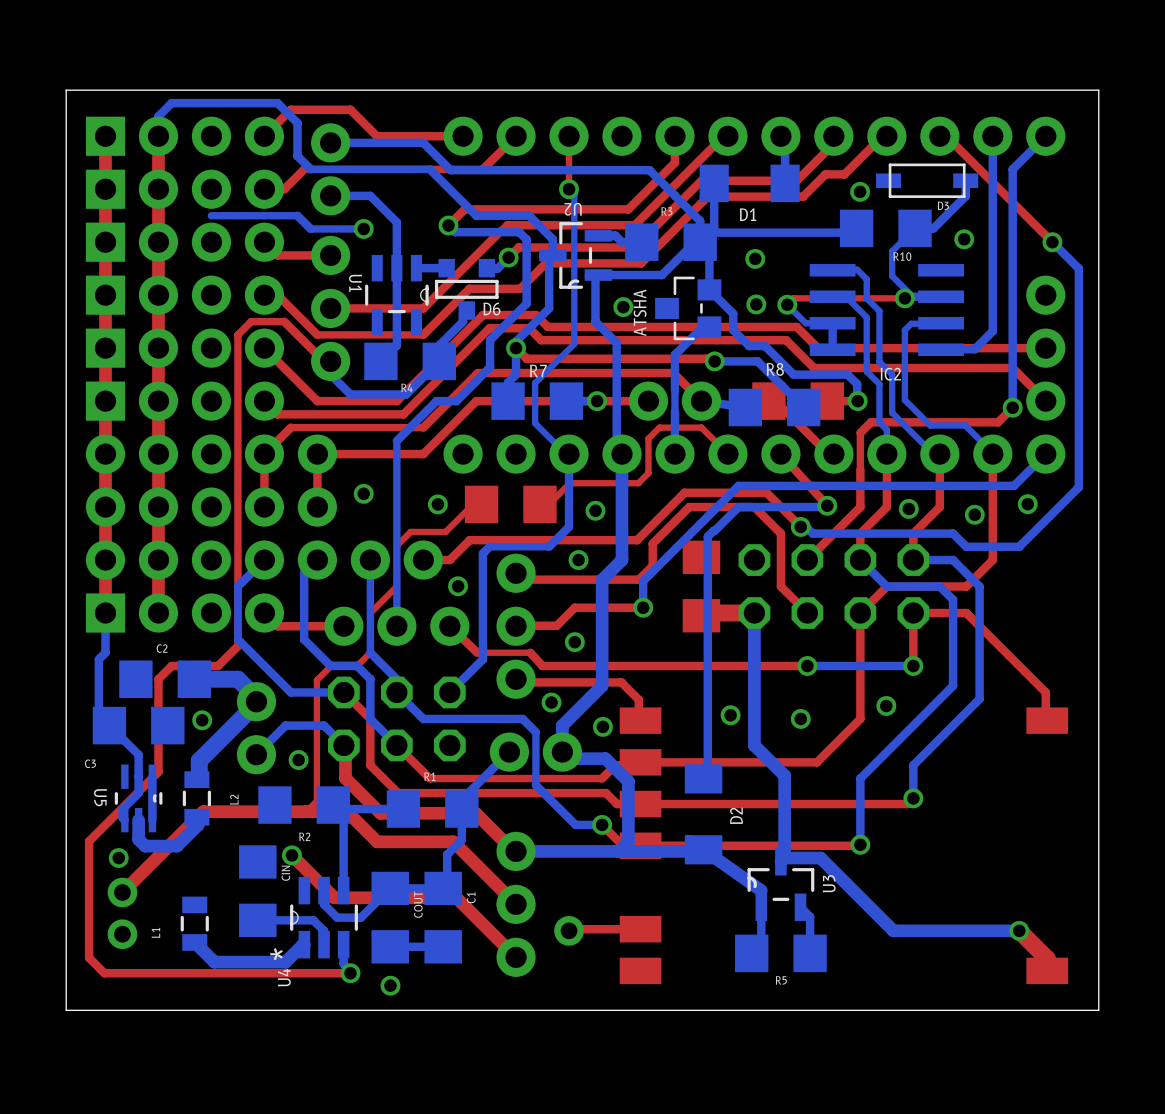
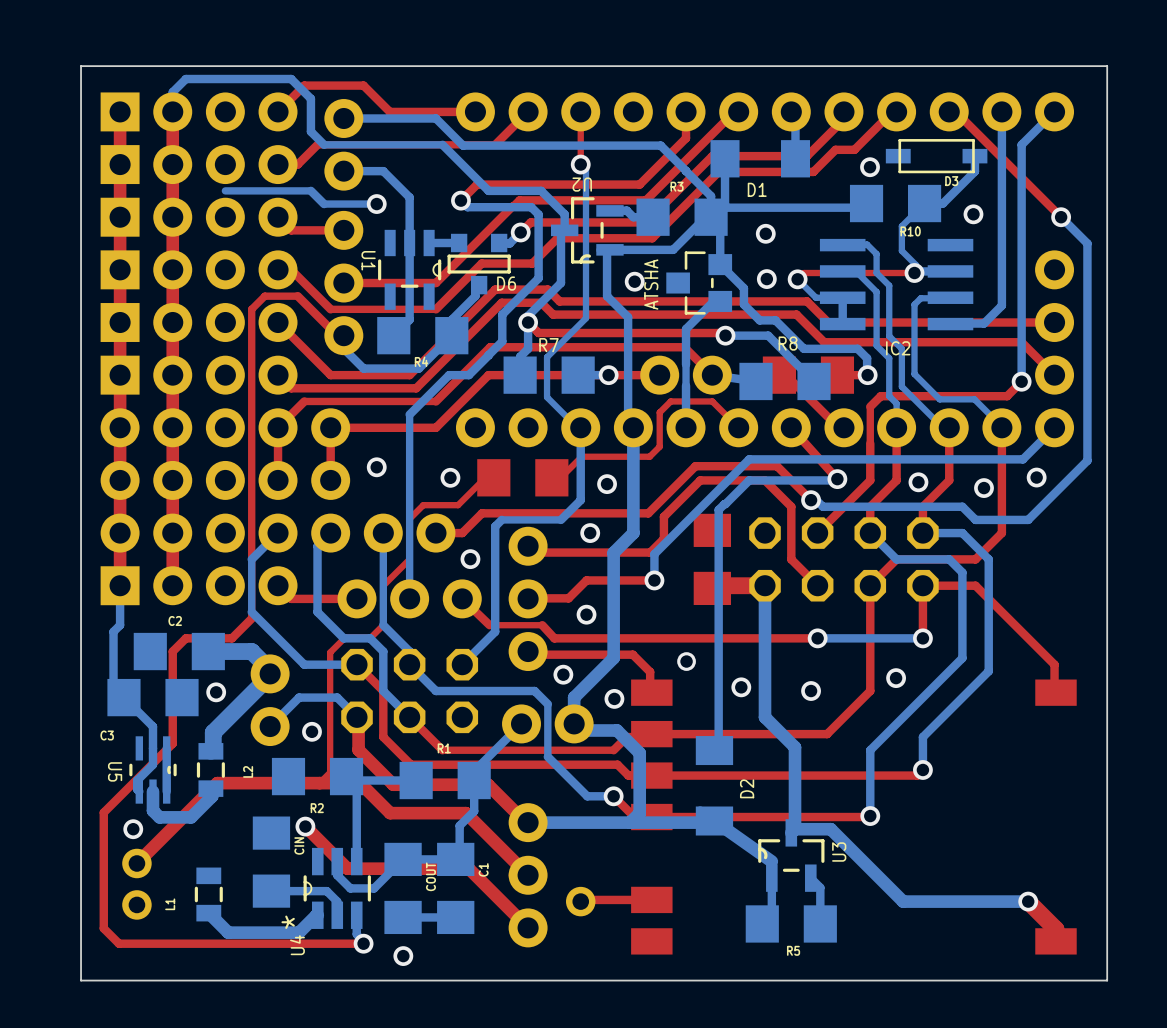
via: none -> (686, 661)

